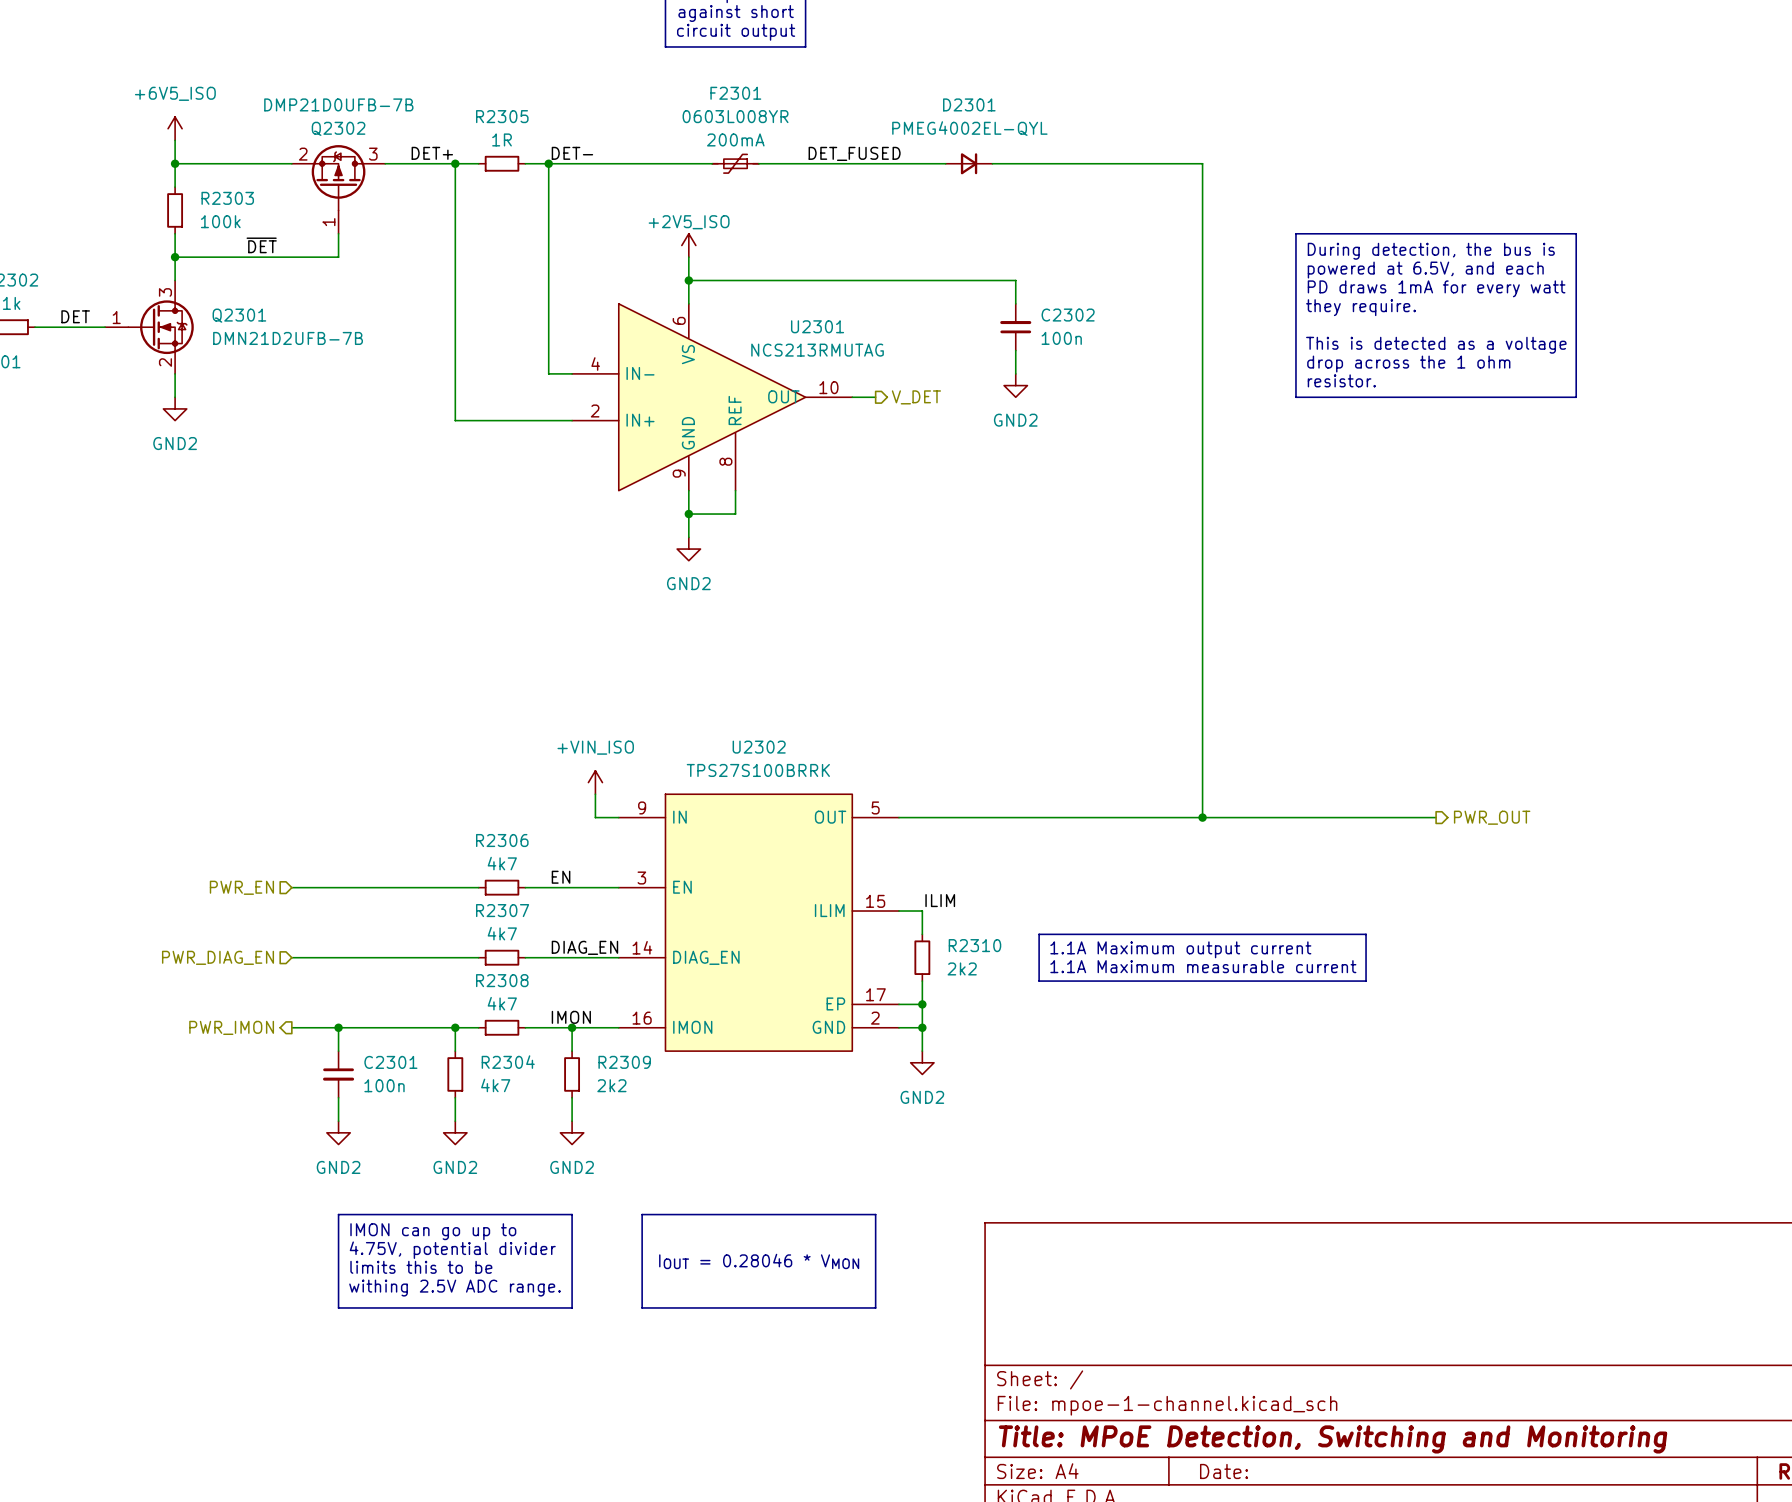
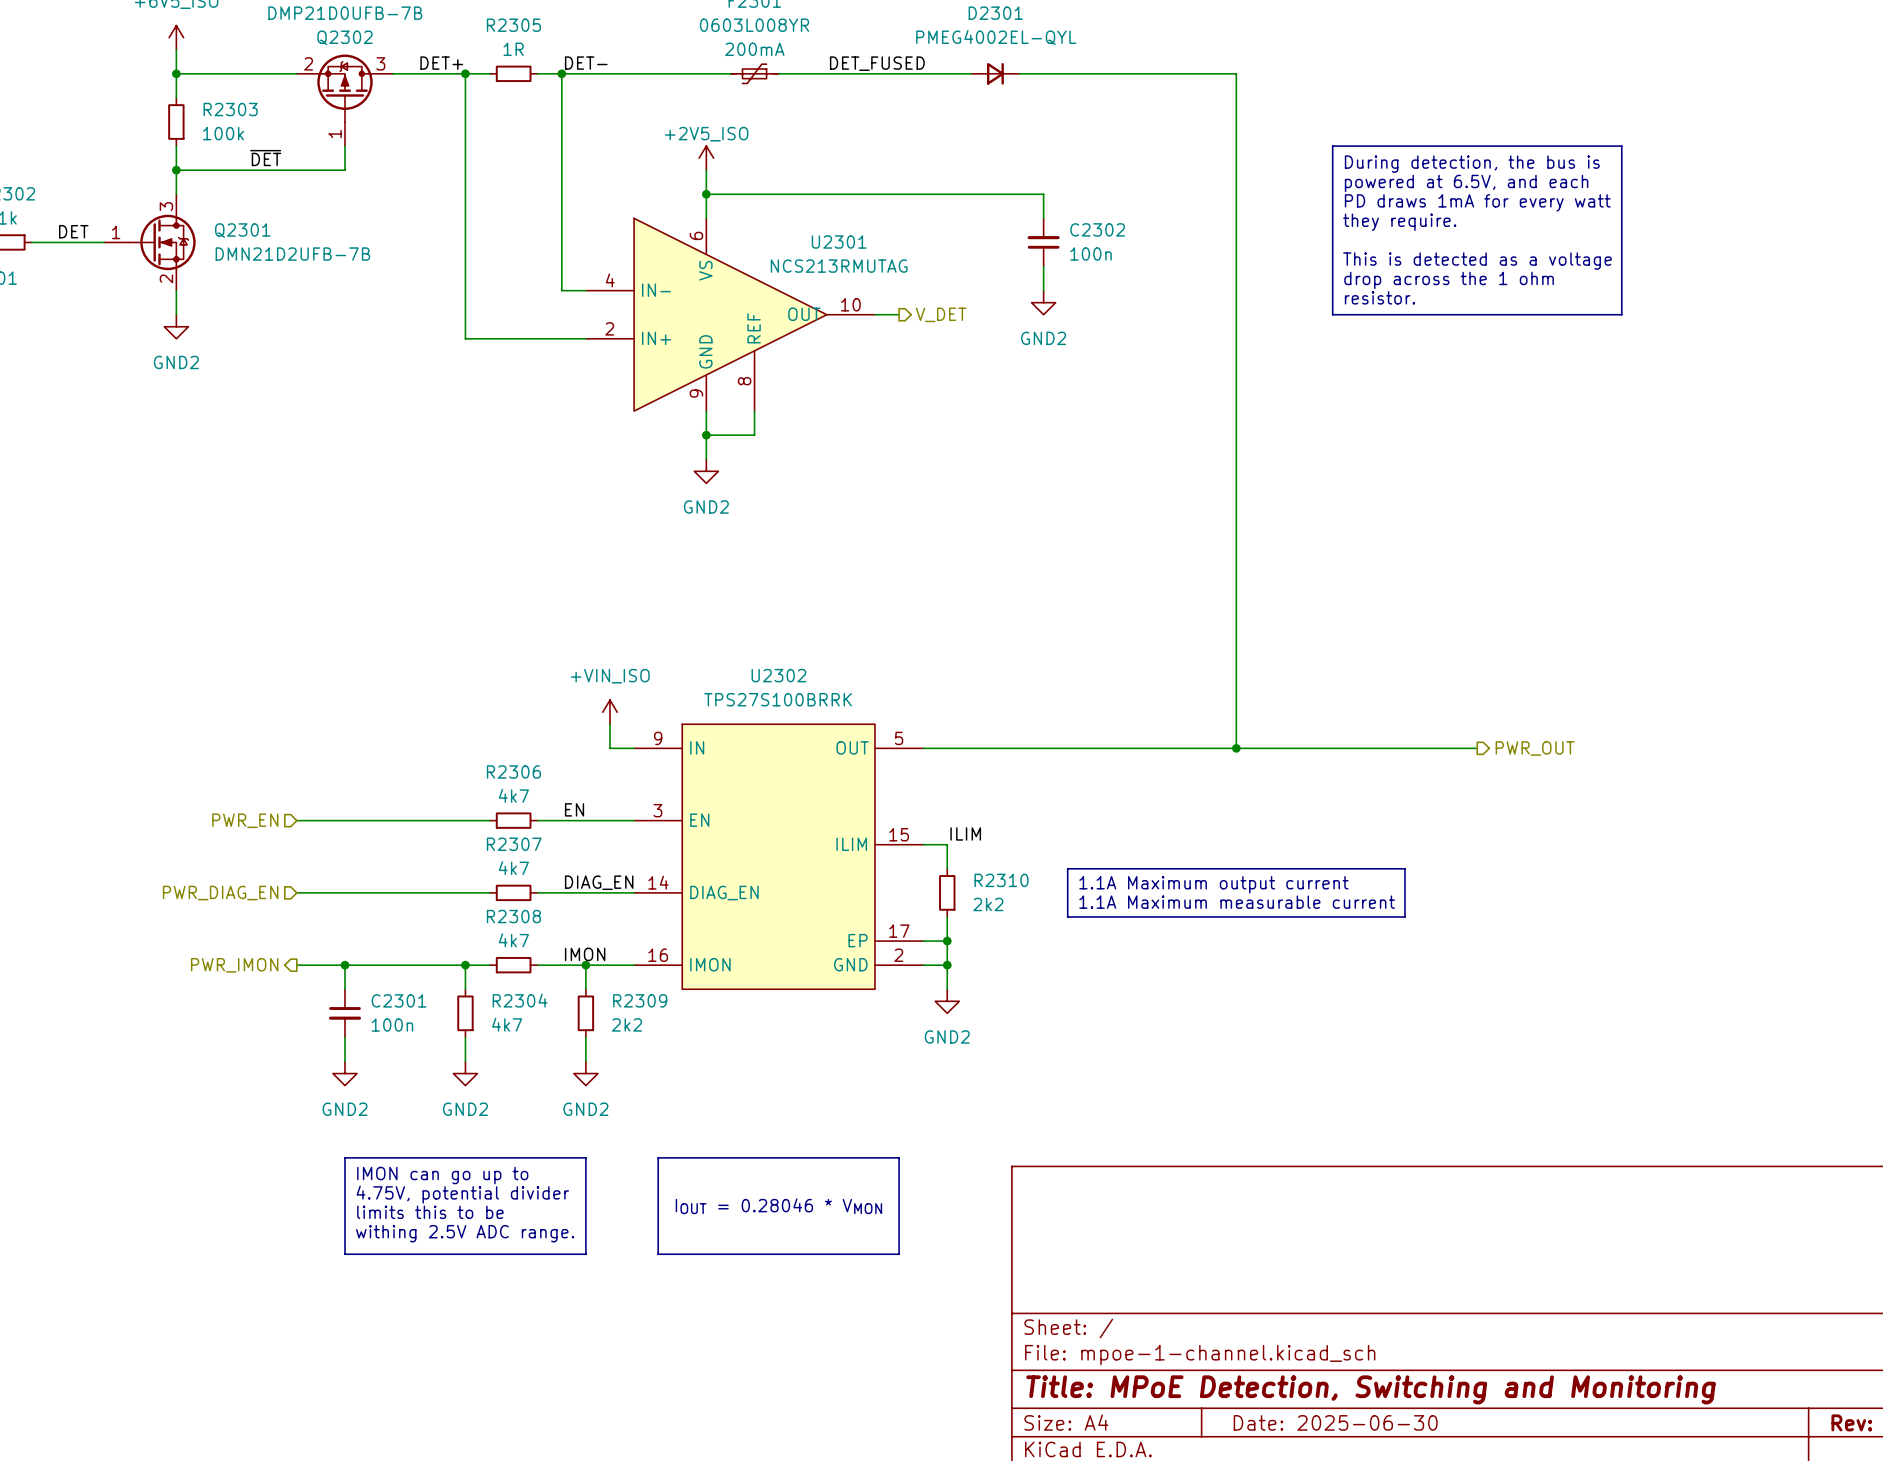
title block: Date: (1224, 1471) -> Date: 2025-06-30 (1335, 1422)

